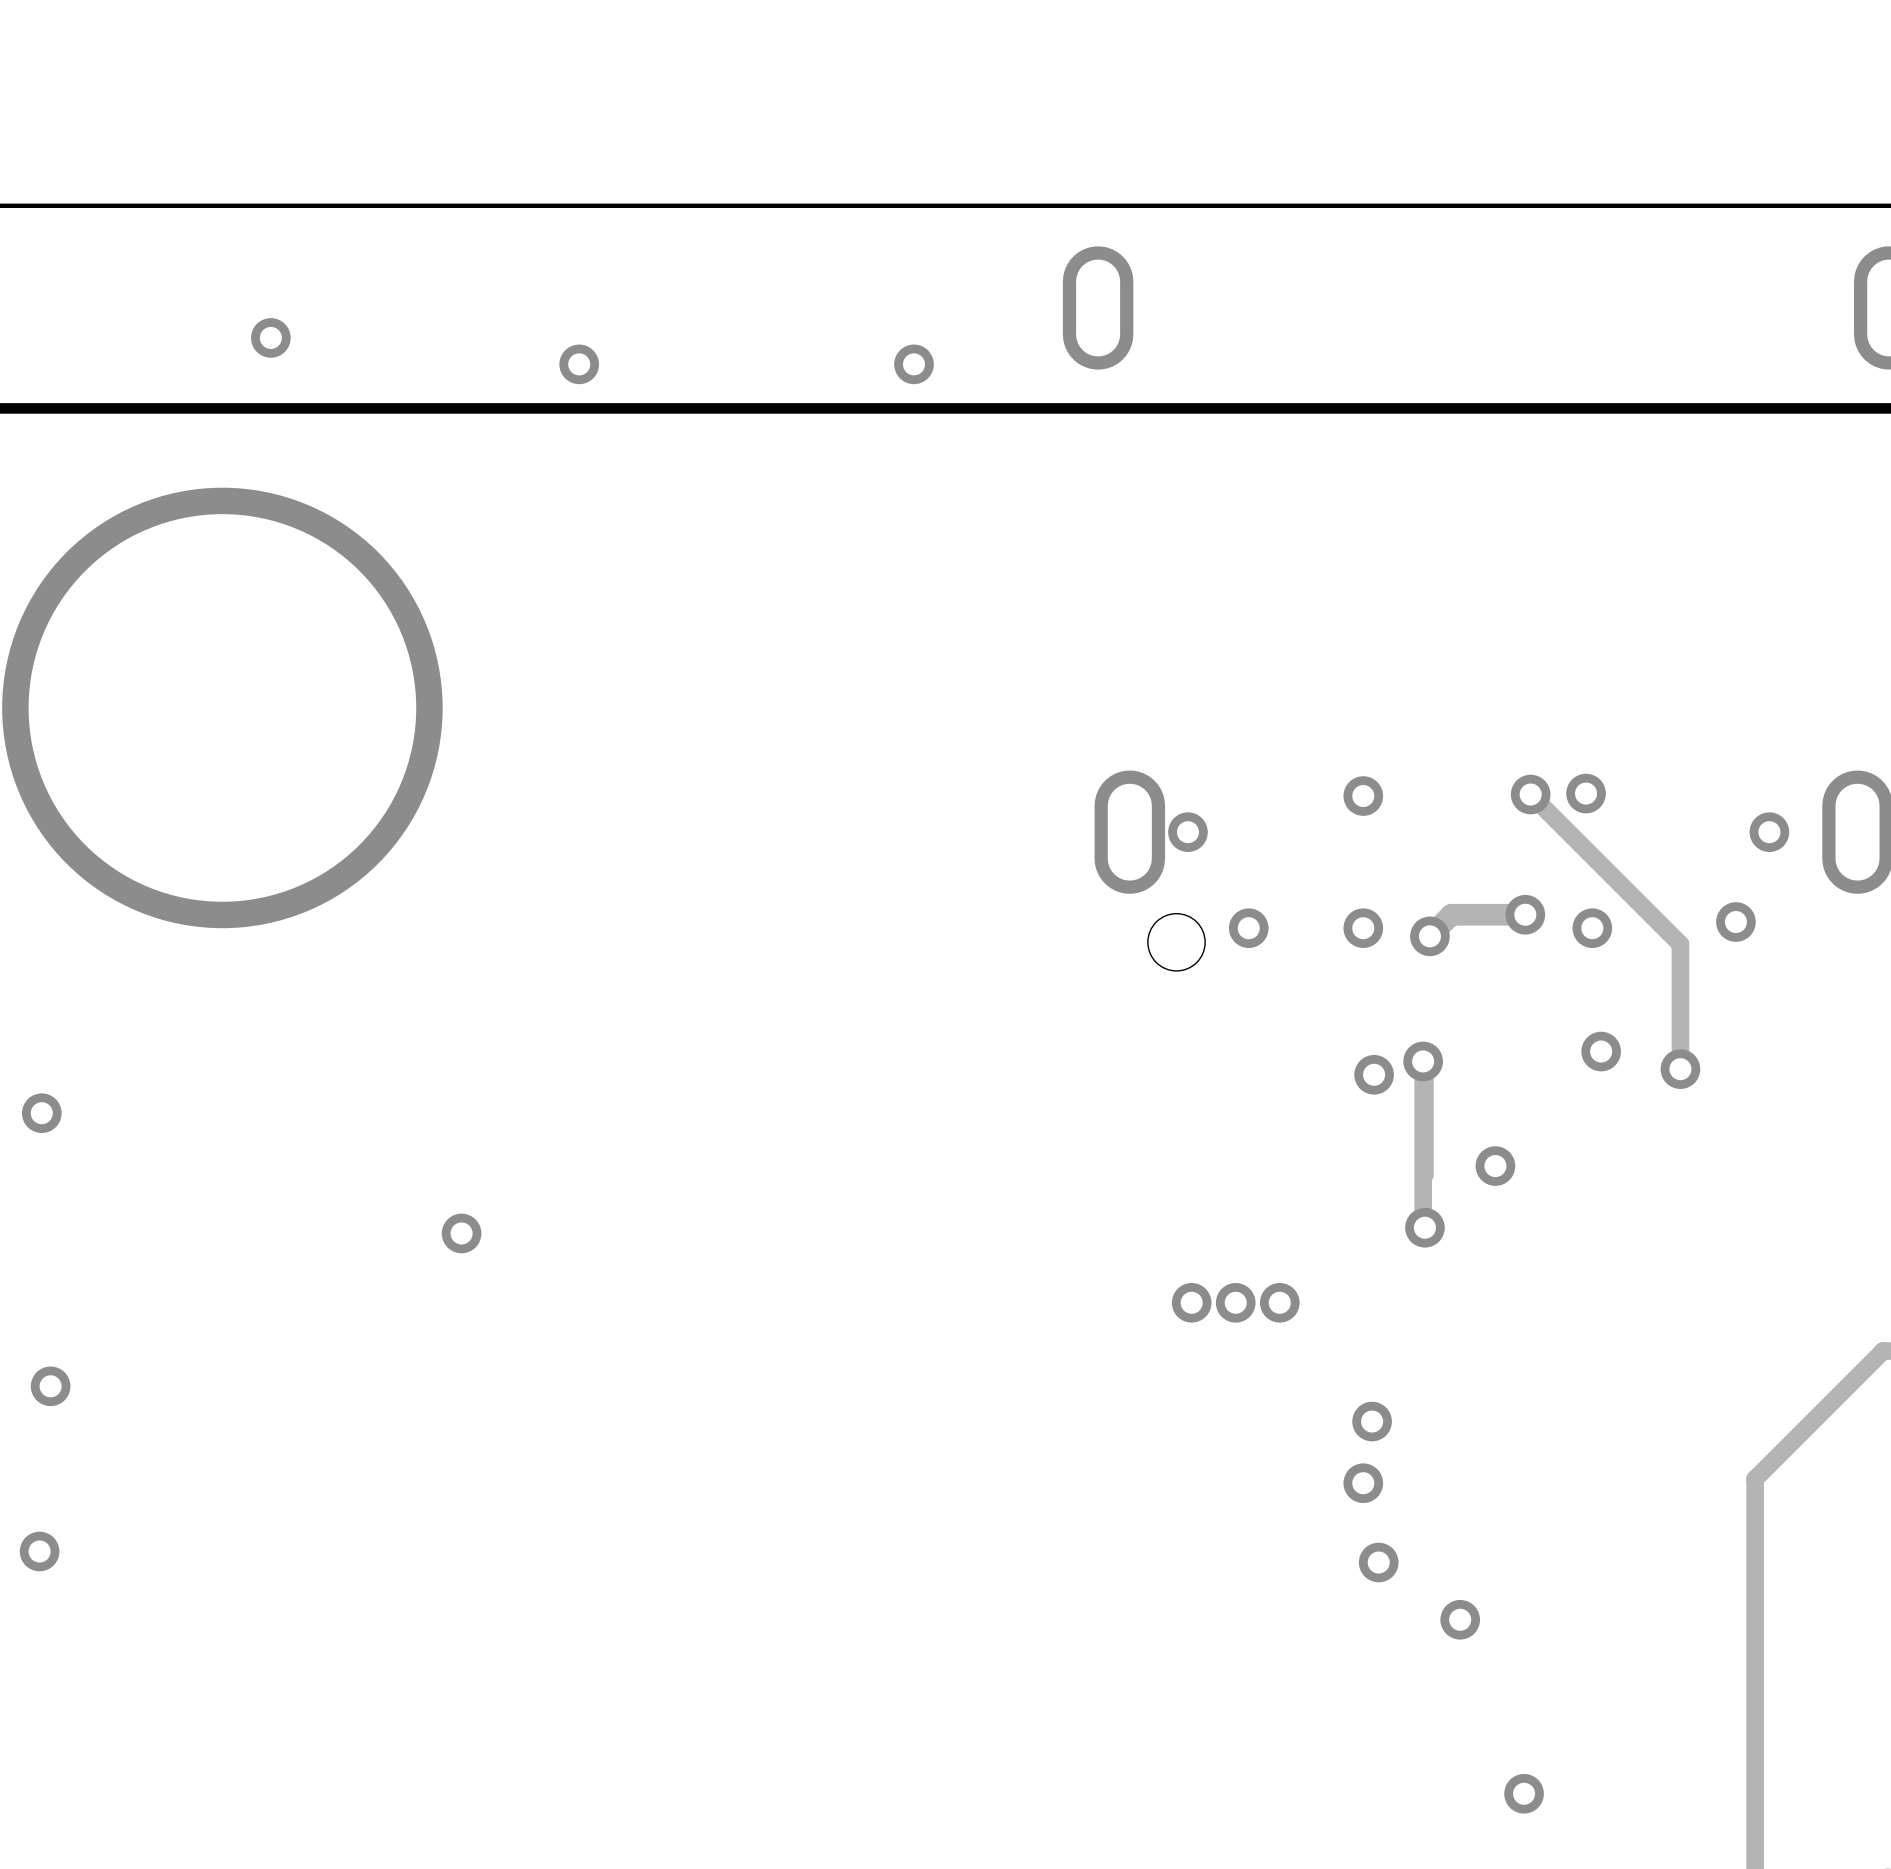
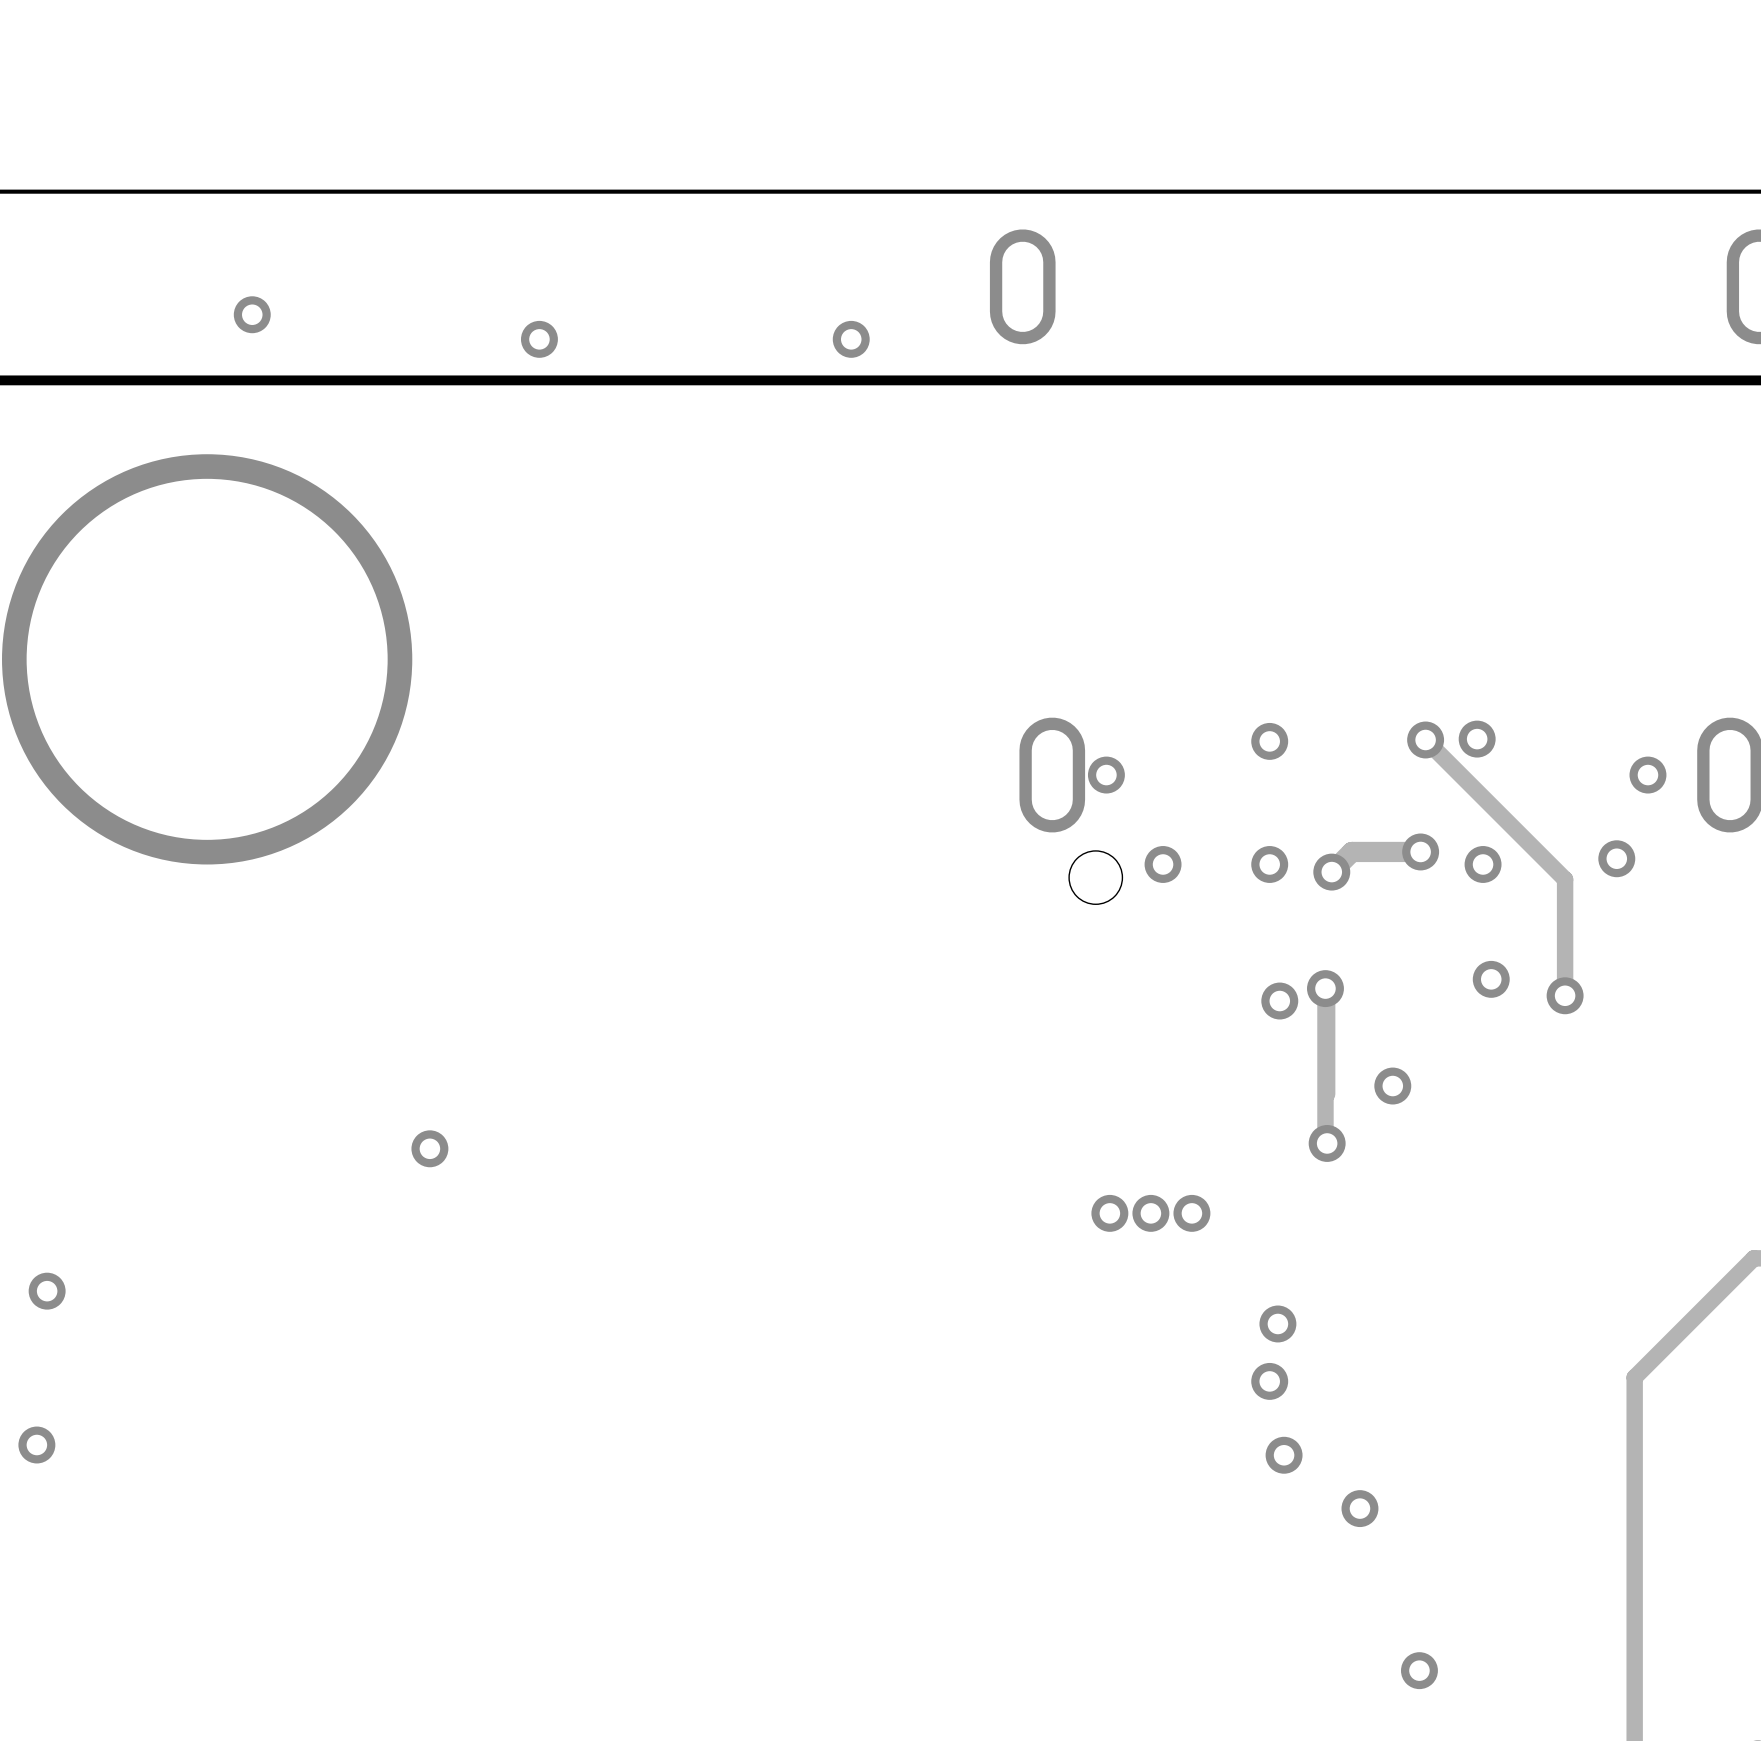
via: (41, 1113) -> none

